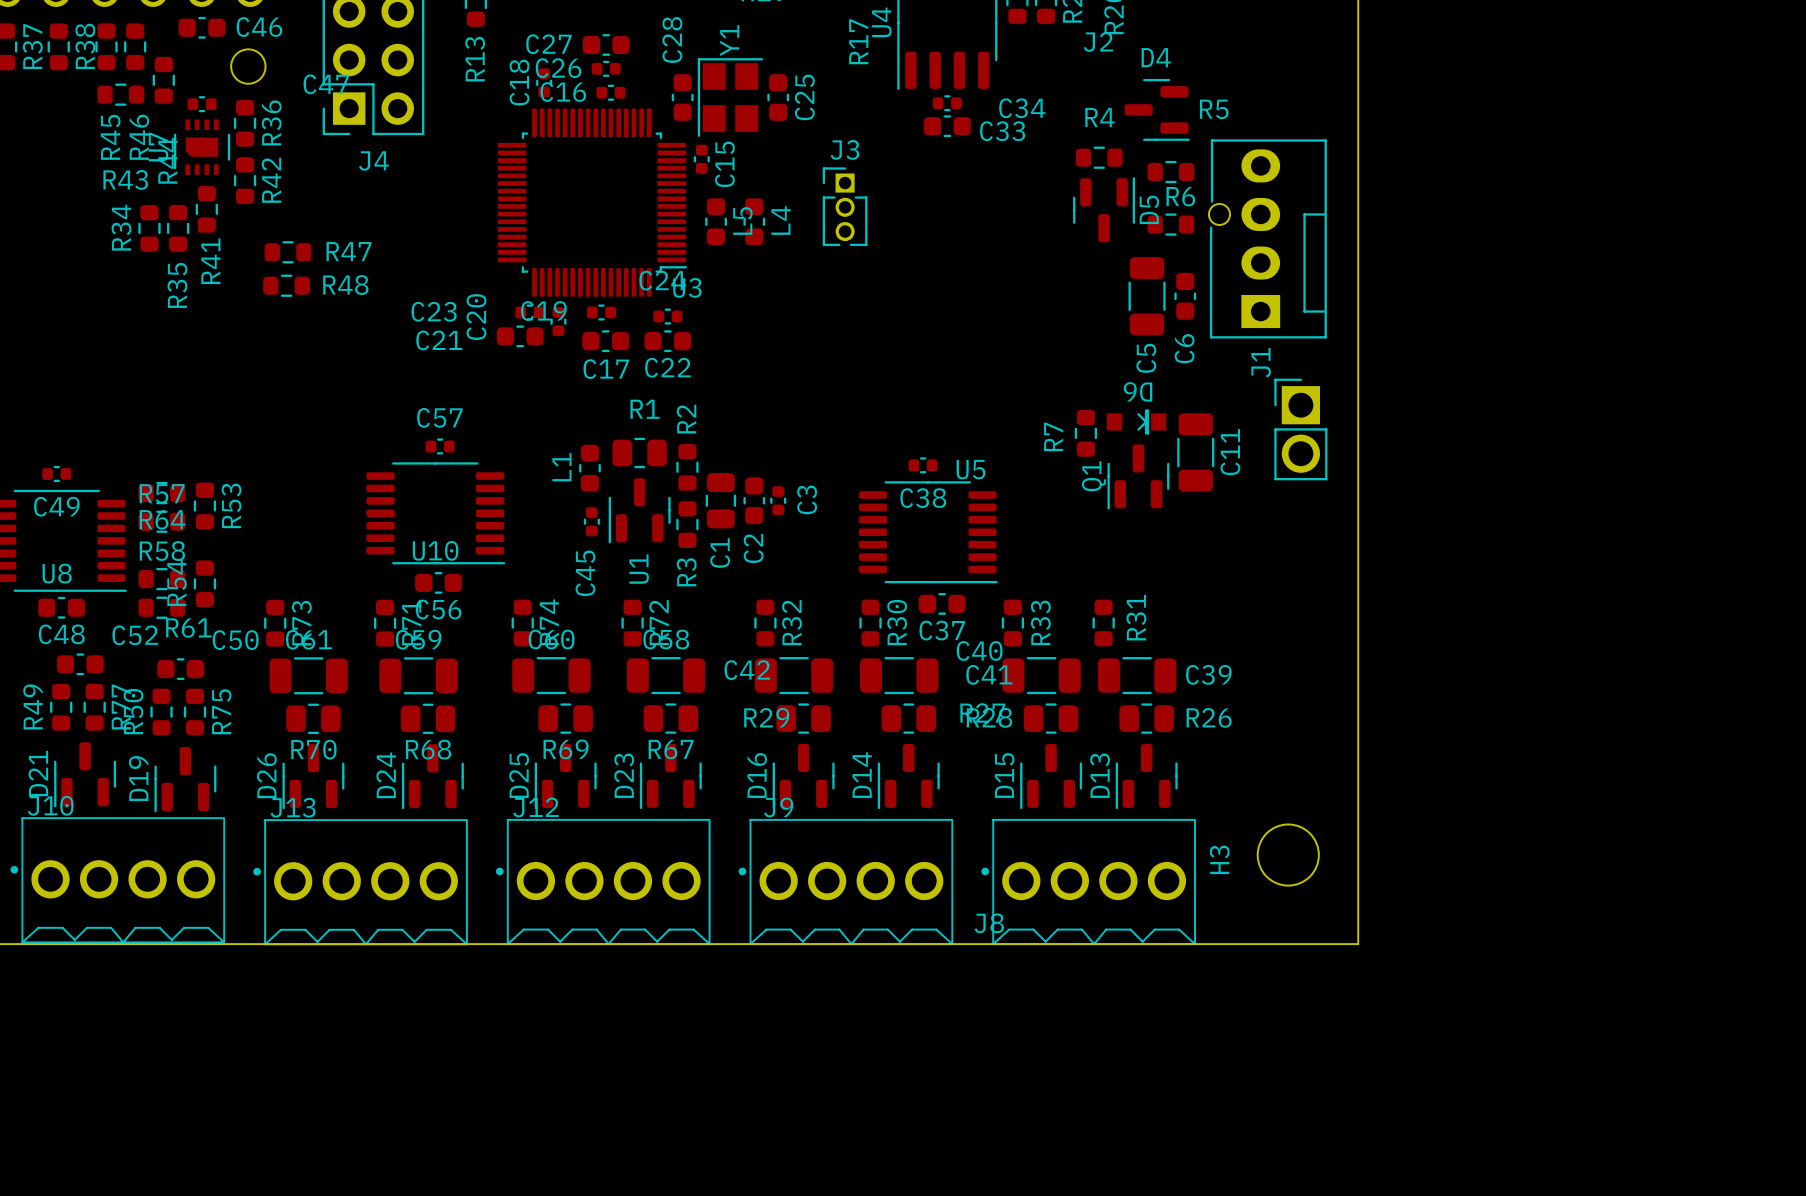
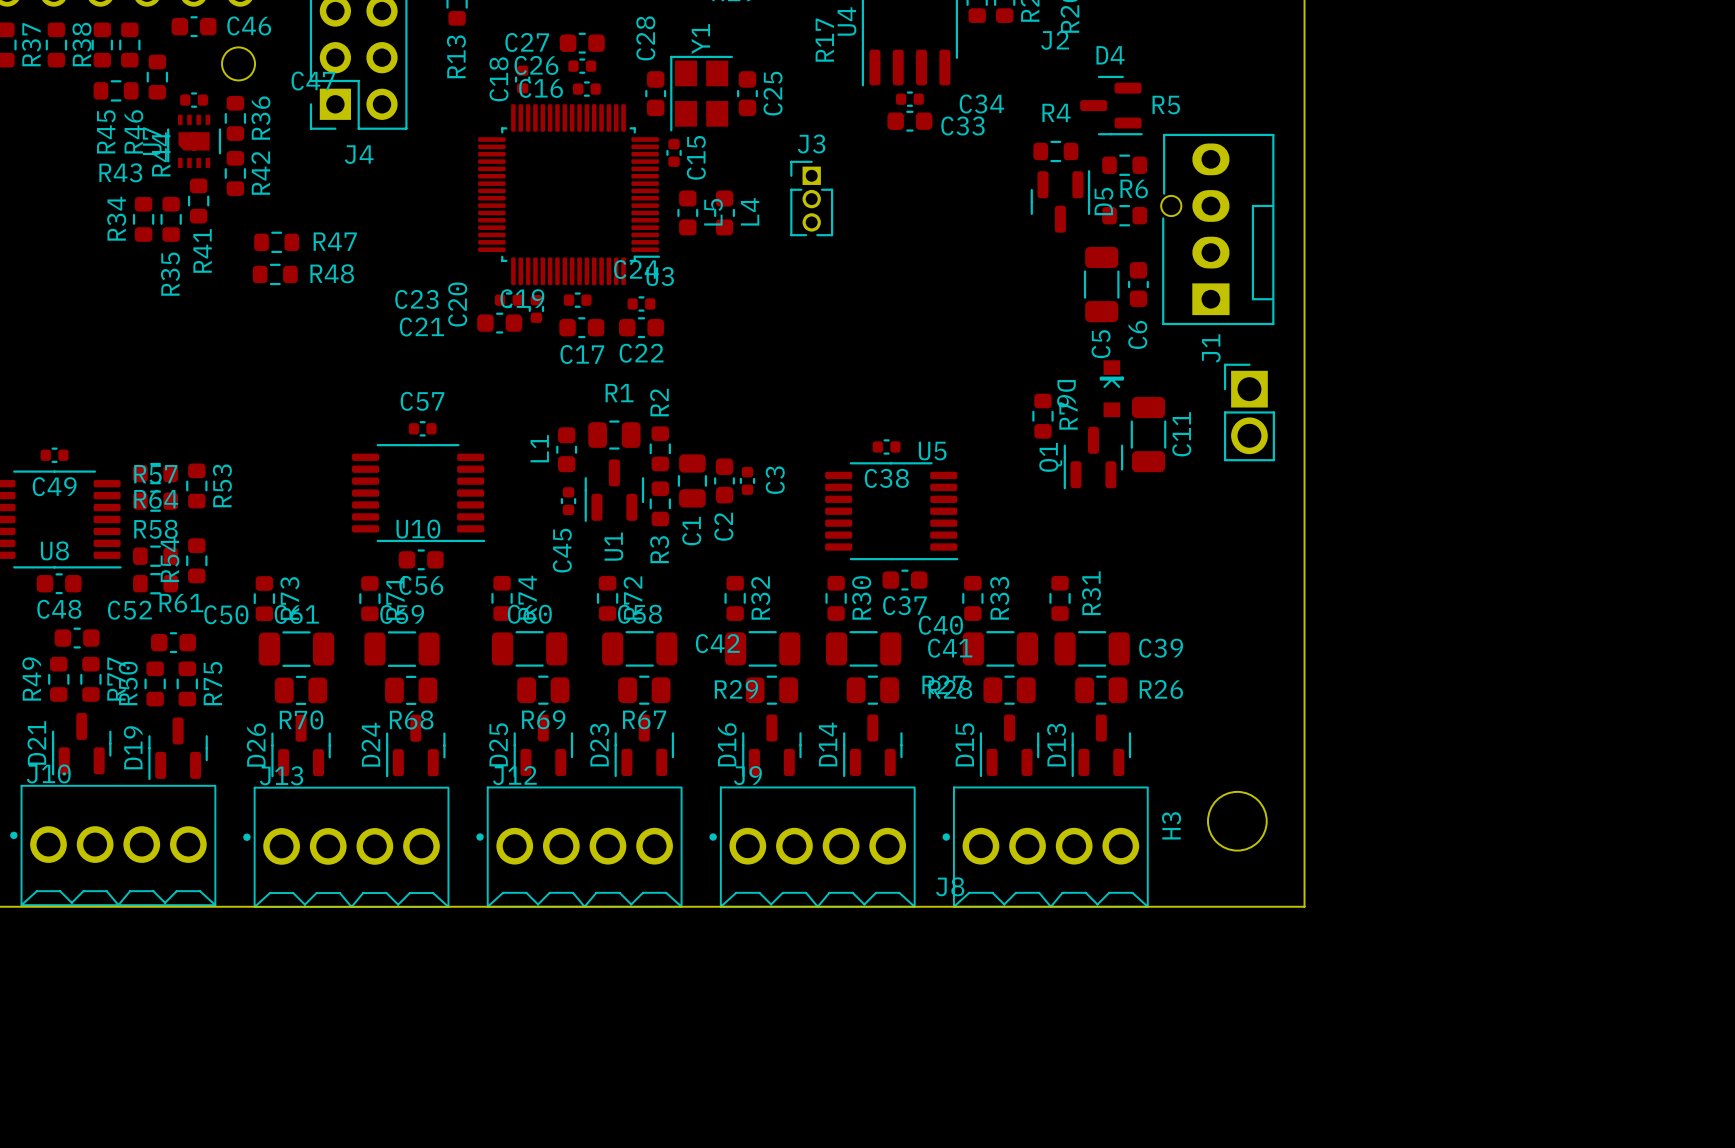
D6 rotation: 0° (1136, 421) -> 90° counterclockwise (1111, 388)
R7 name position: R7 (1053, 436) -> R7 (1068, 415)

